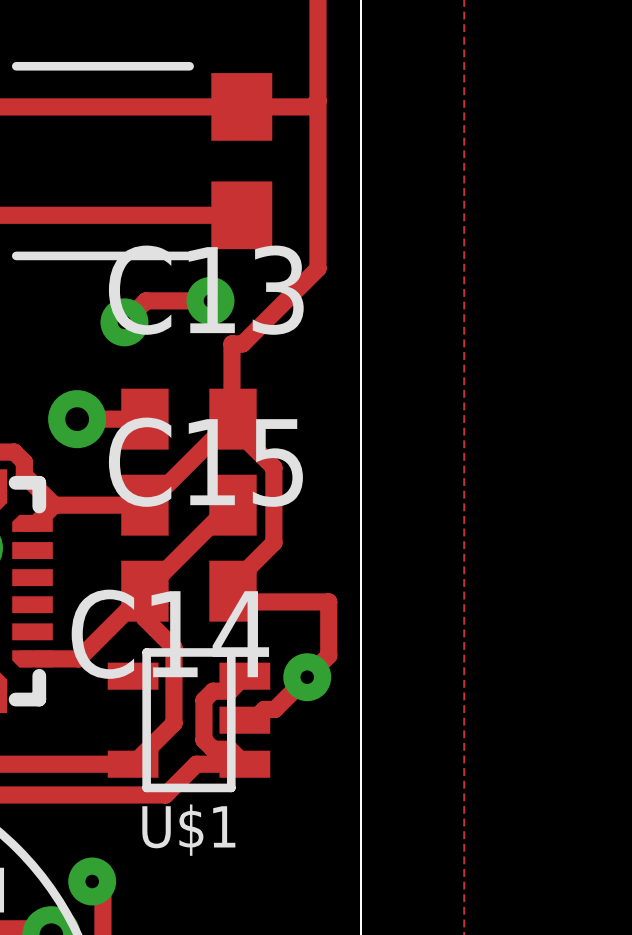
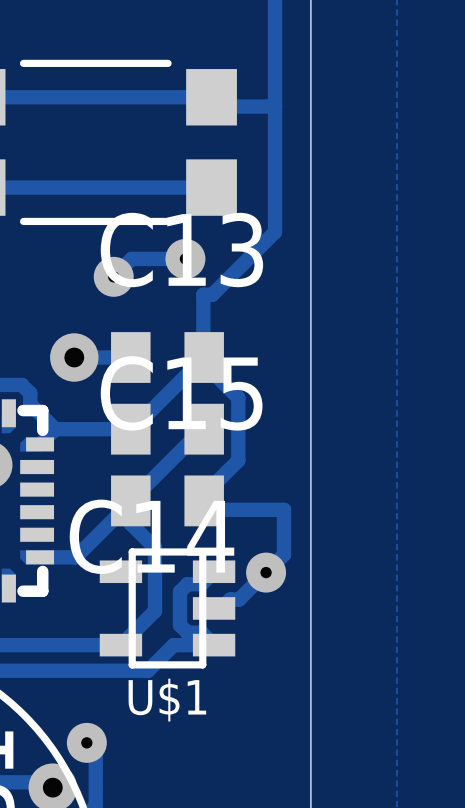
track: (318, 100) (311, 106) (241, 106) -> none
track: none -> (221, 106) (275, 106)

